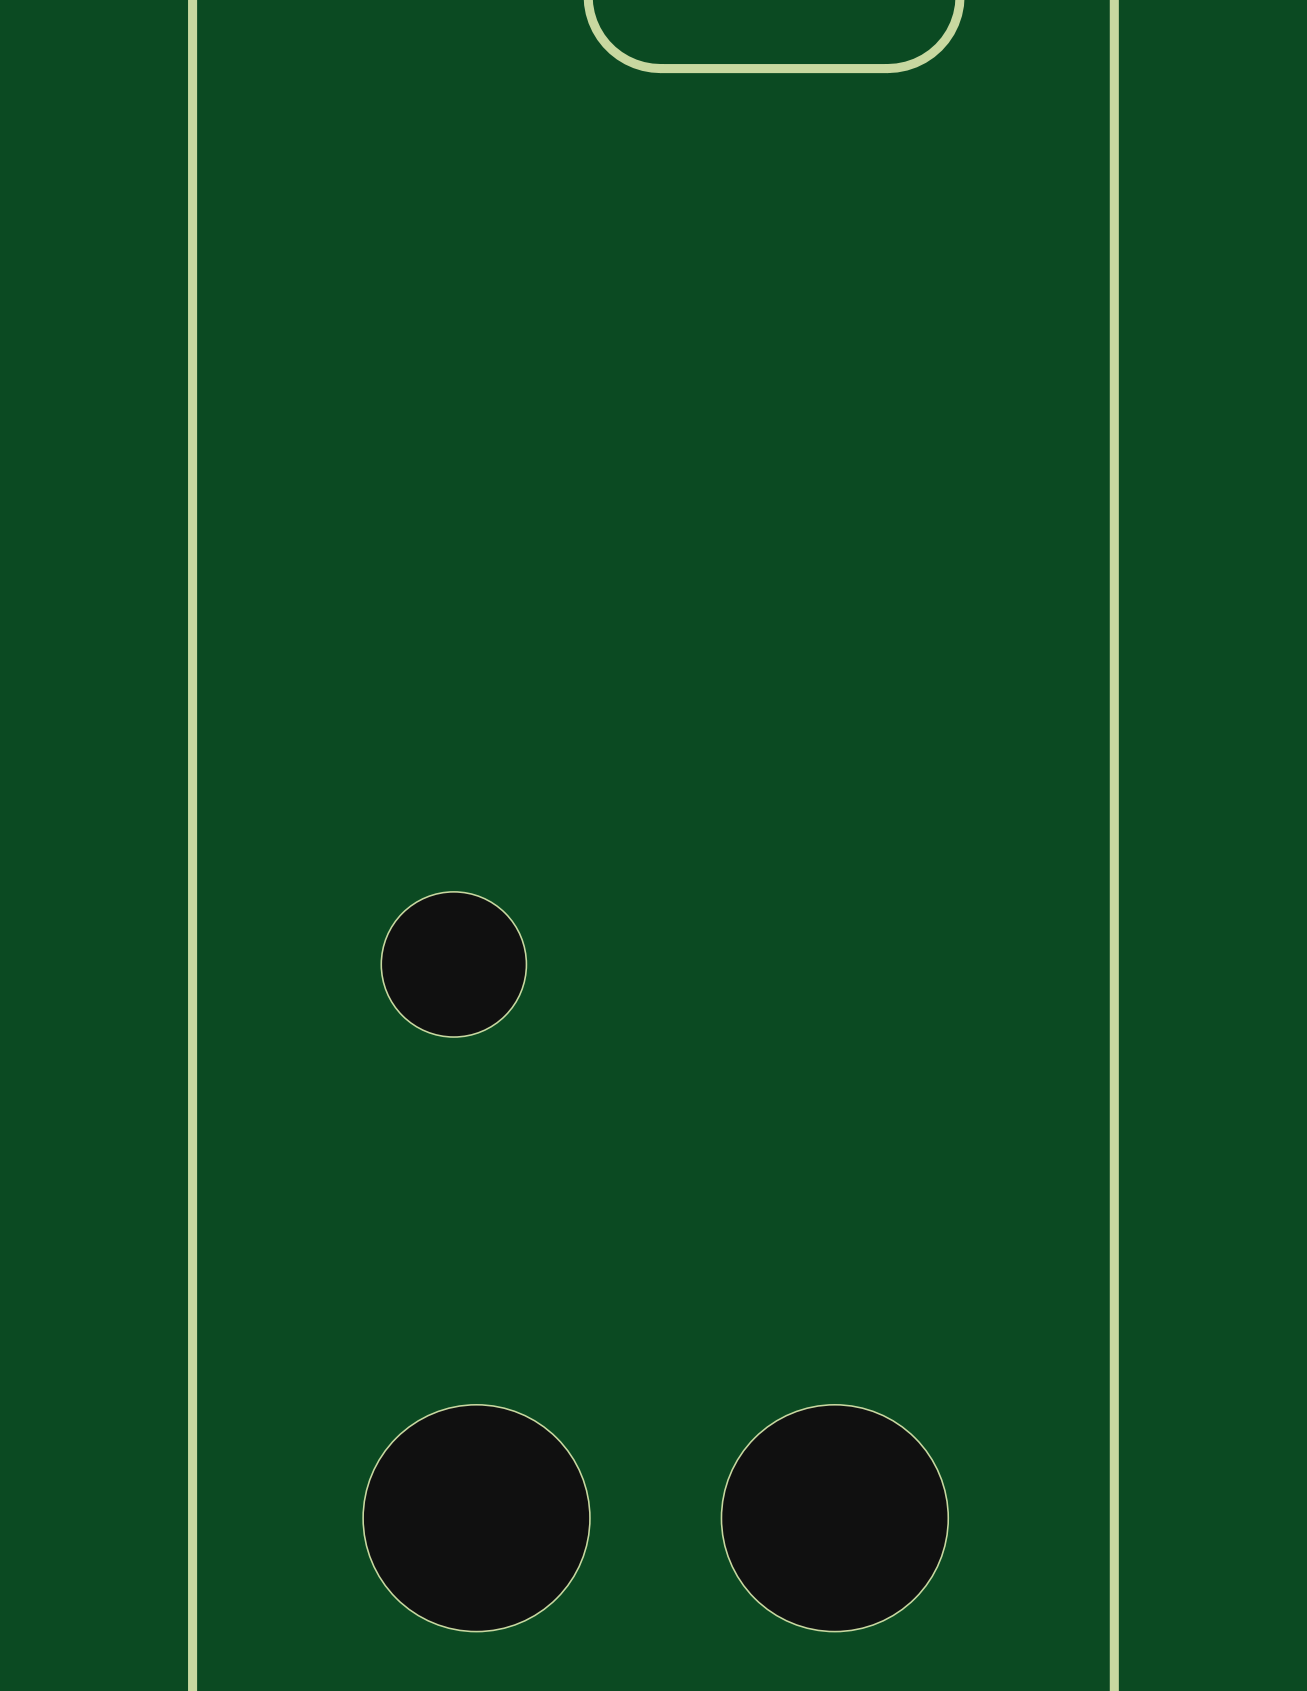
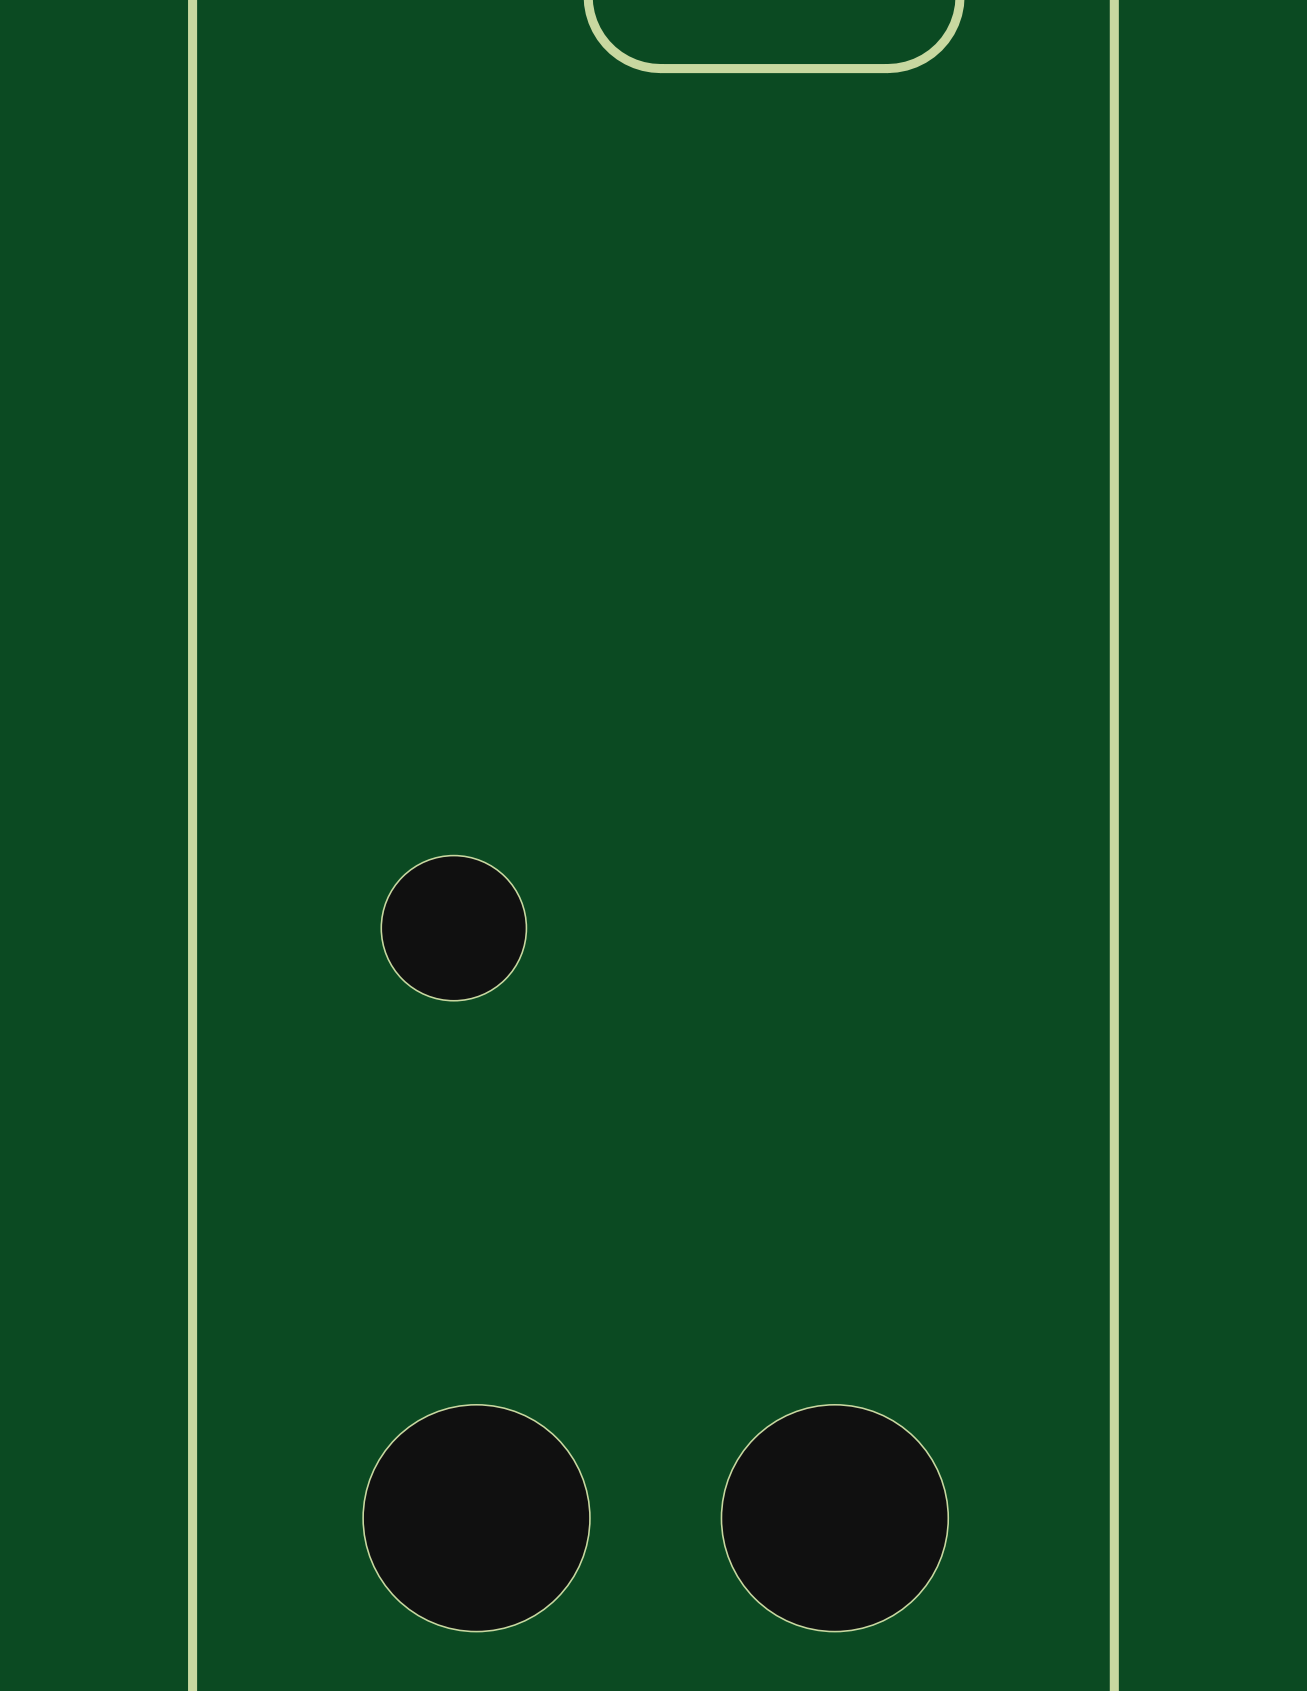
part position: (453, 964) -> (453, 928)

